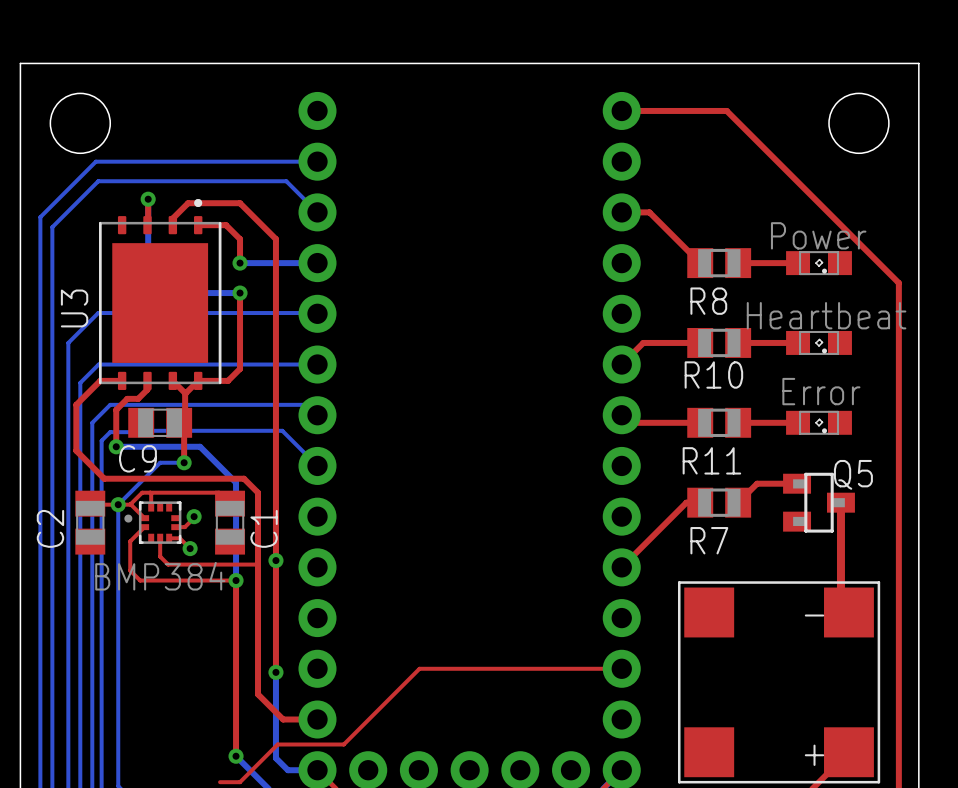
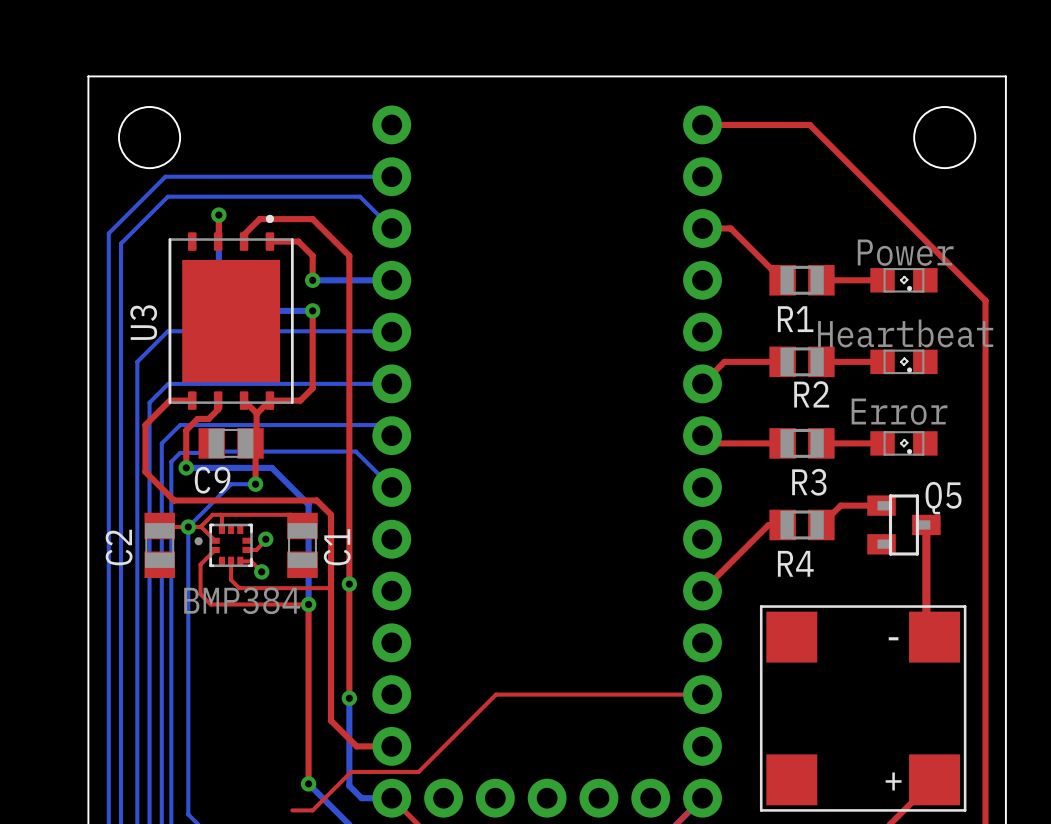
R8 name: R8 (708, 301) -> R1 (795, 319)
R10 name: R10 (713, 375) -> R2 (811, 394)
R11 name: R11 (711, 460) -> R3 (809, 482)
R7 name: R7 (709, 540) -> R4 (795, 563)

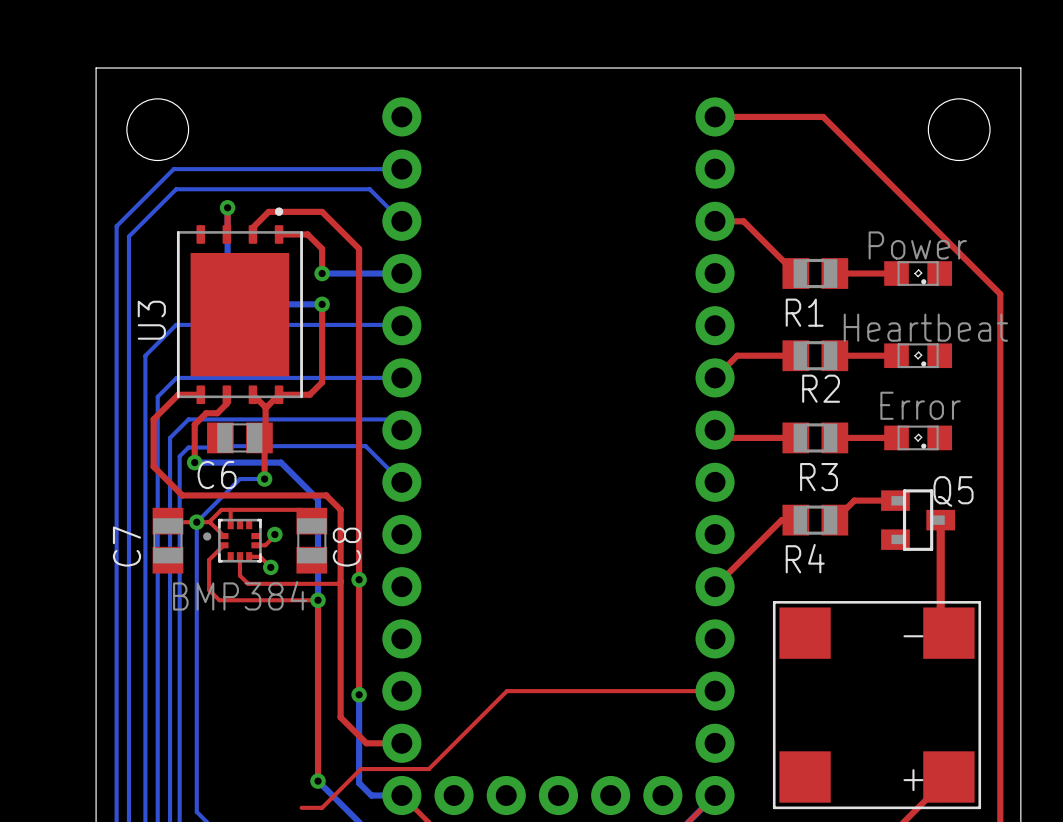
C9 name: C9 (212, 480) -> C6 (217, 475)
C2 name: C2 (119, 547) -> C7 (127, 546)
C1 name: C1 (337, 547) -> C8 (346, 547)

